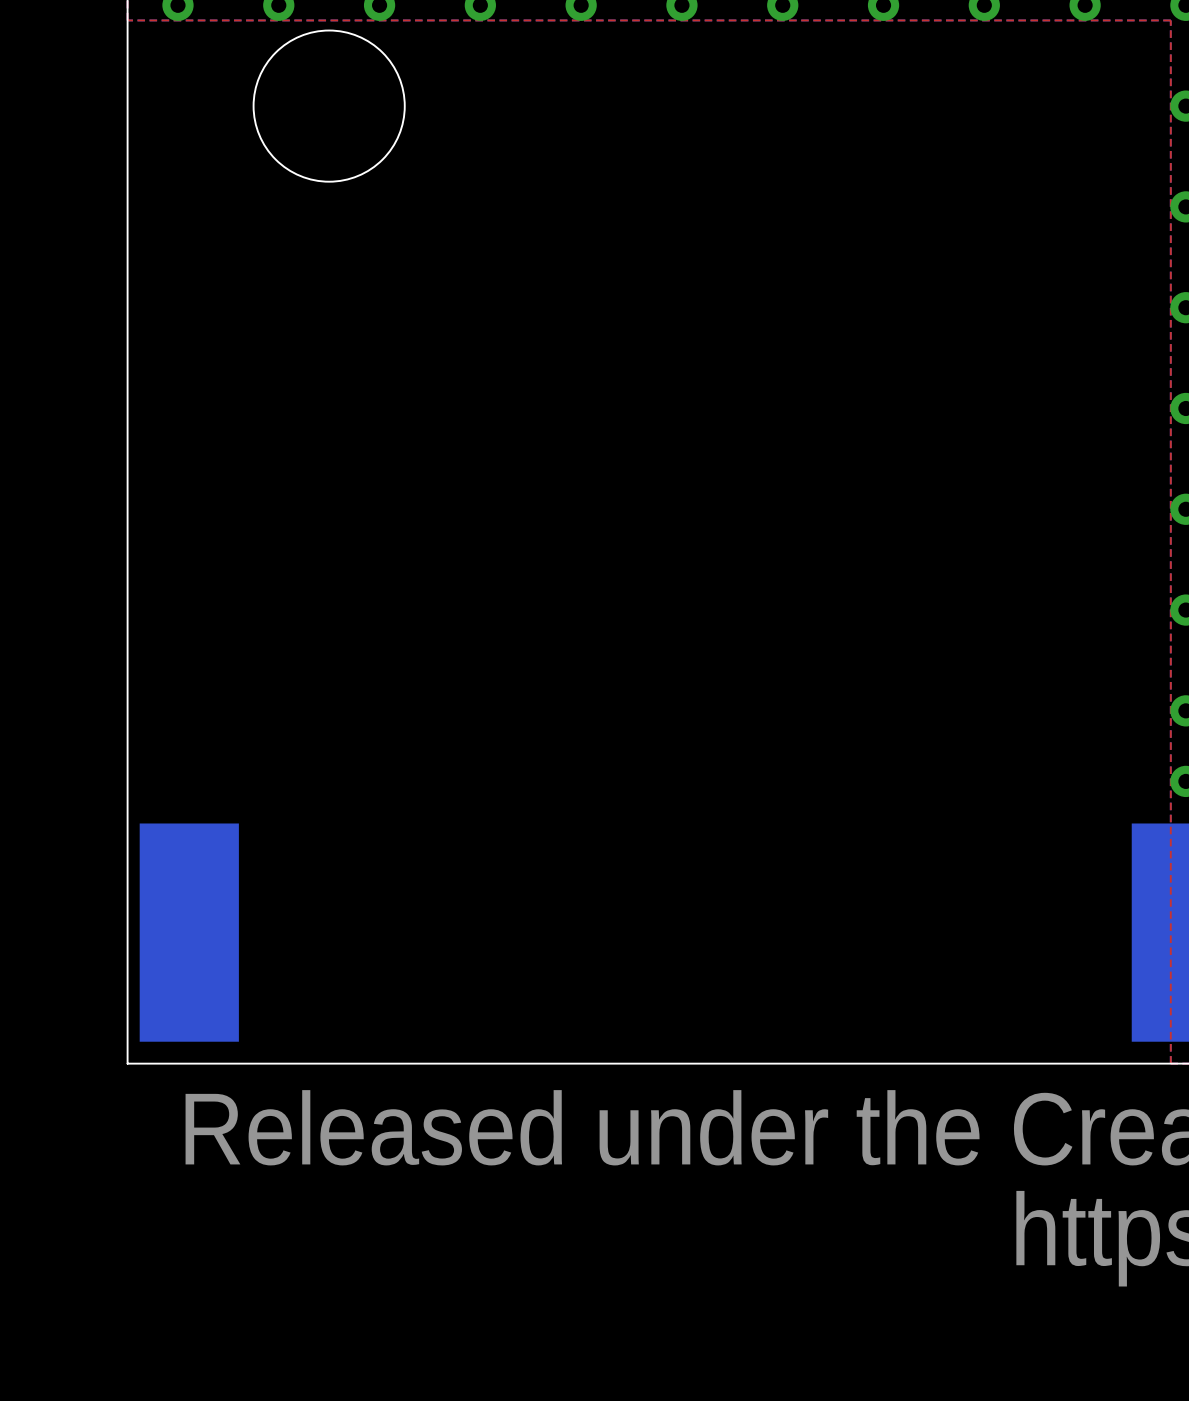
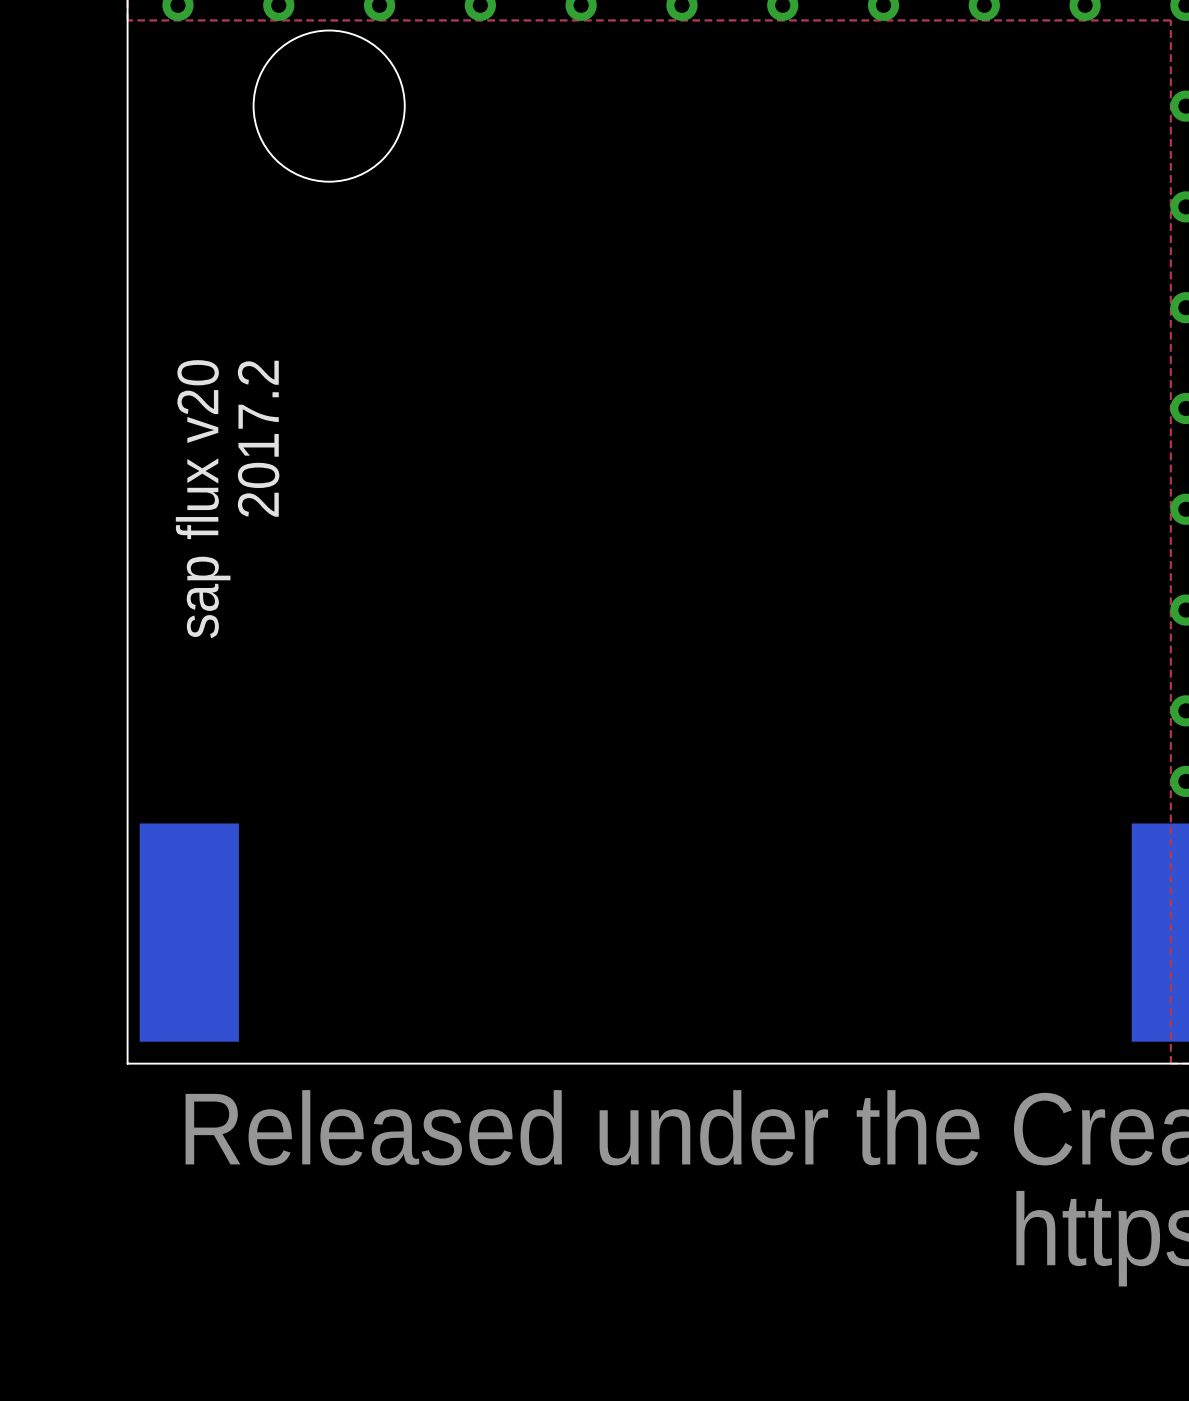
text: none -> 2017.2 (258, 438)
text: none -> sap flux v20 (203, 499)

